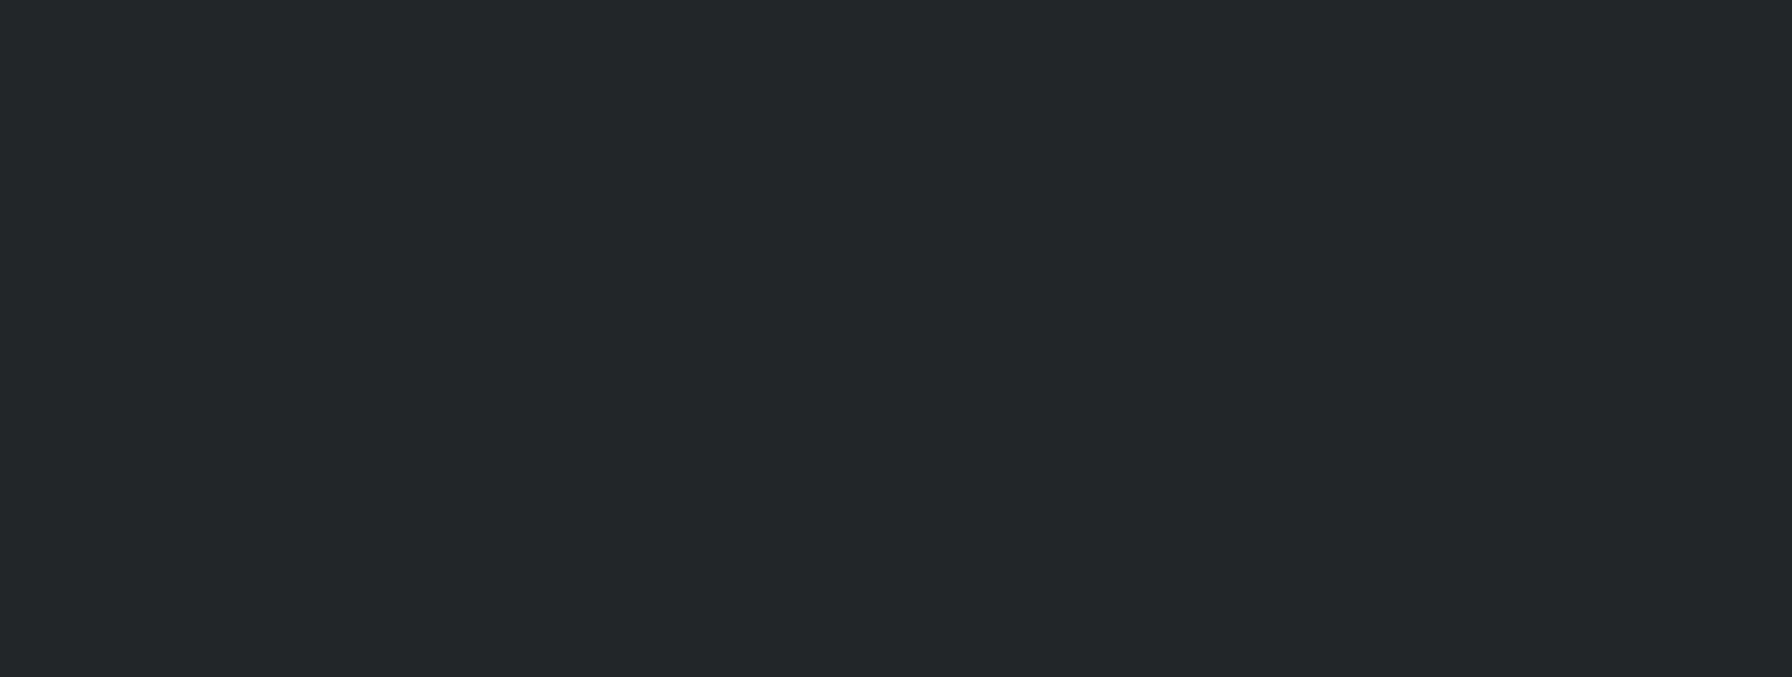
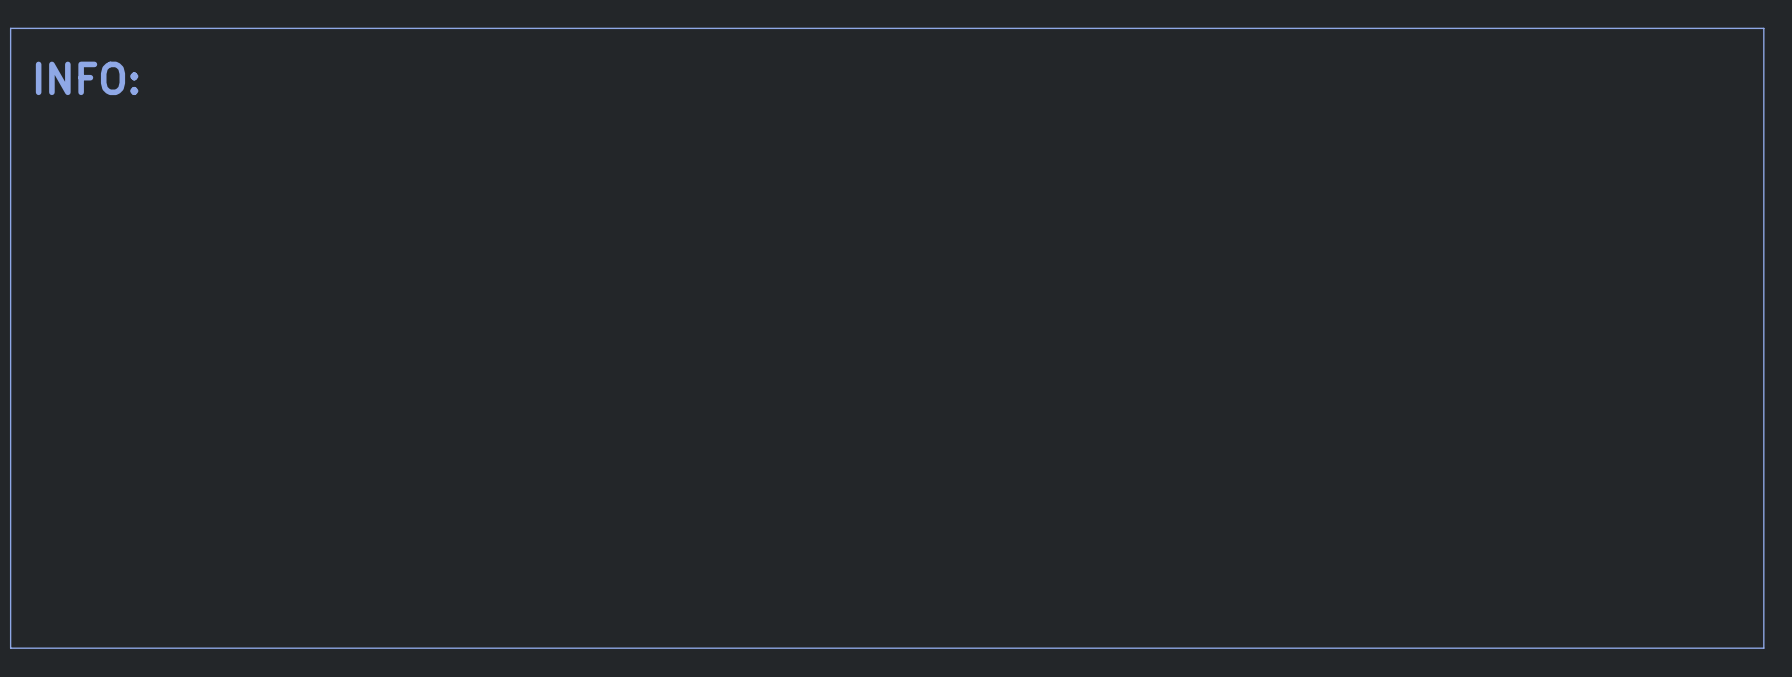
line: none -> (10, 28) (1763, 28) (1763, 648) (10, 648) (10, 28)
text: none -> INFO: (87, 78)

